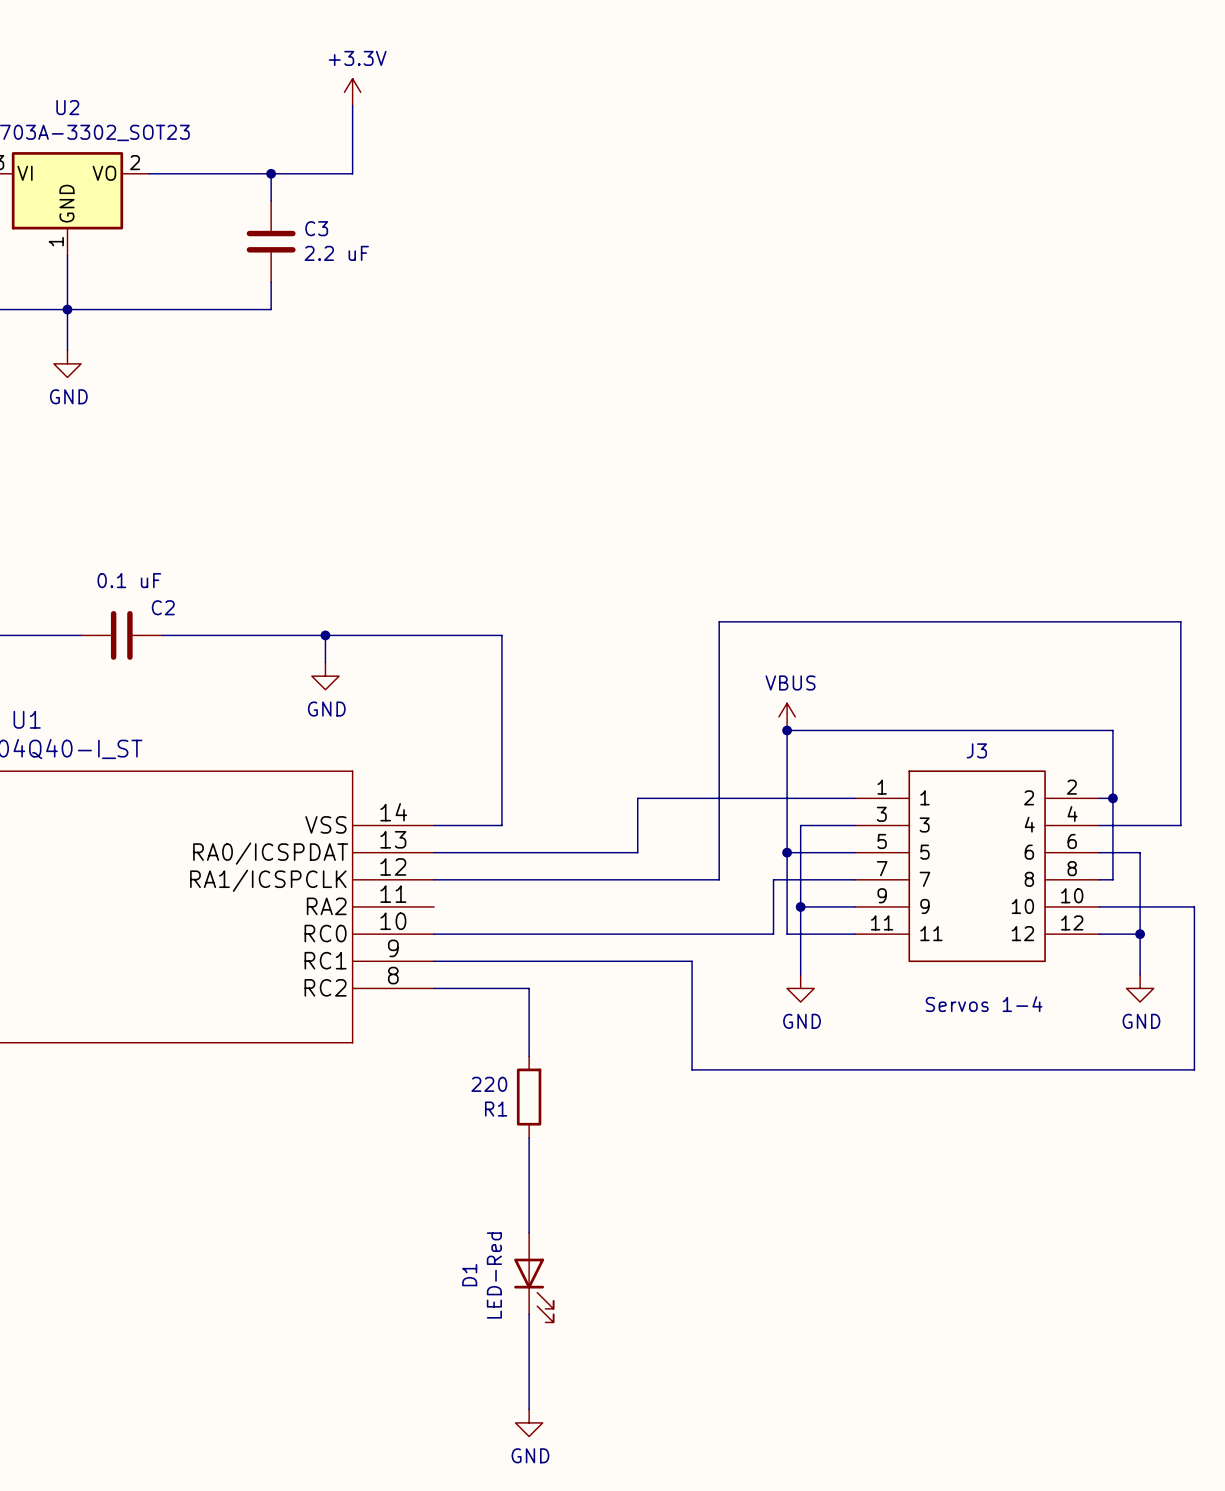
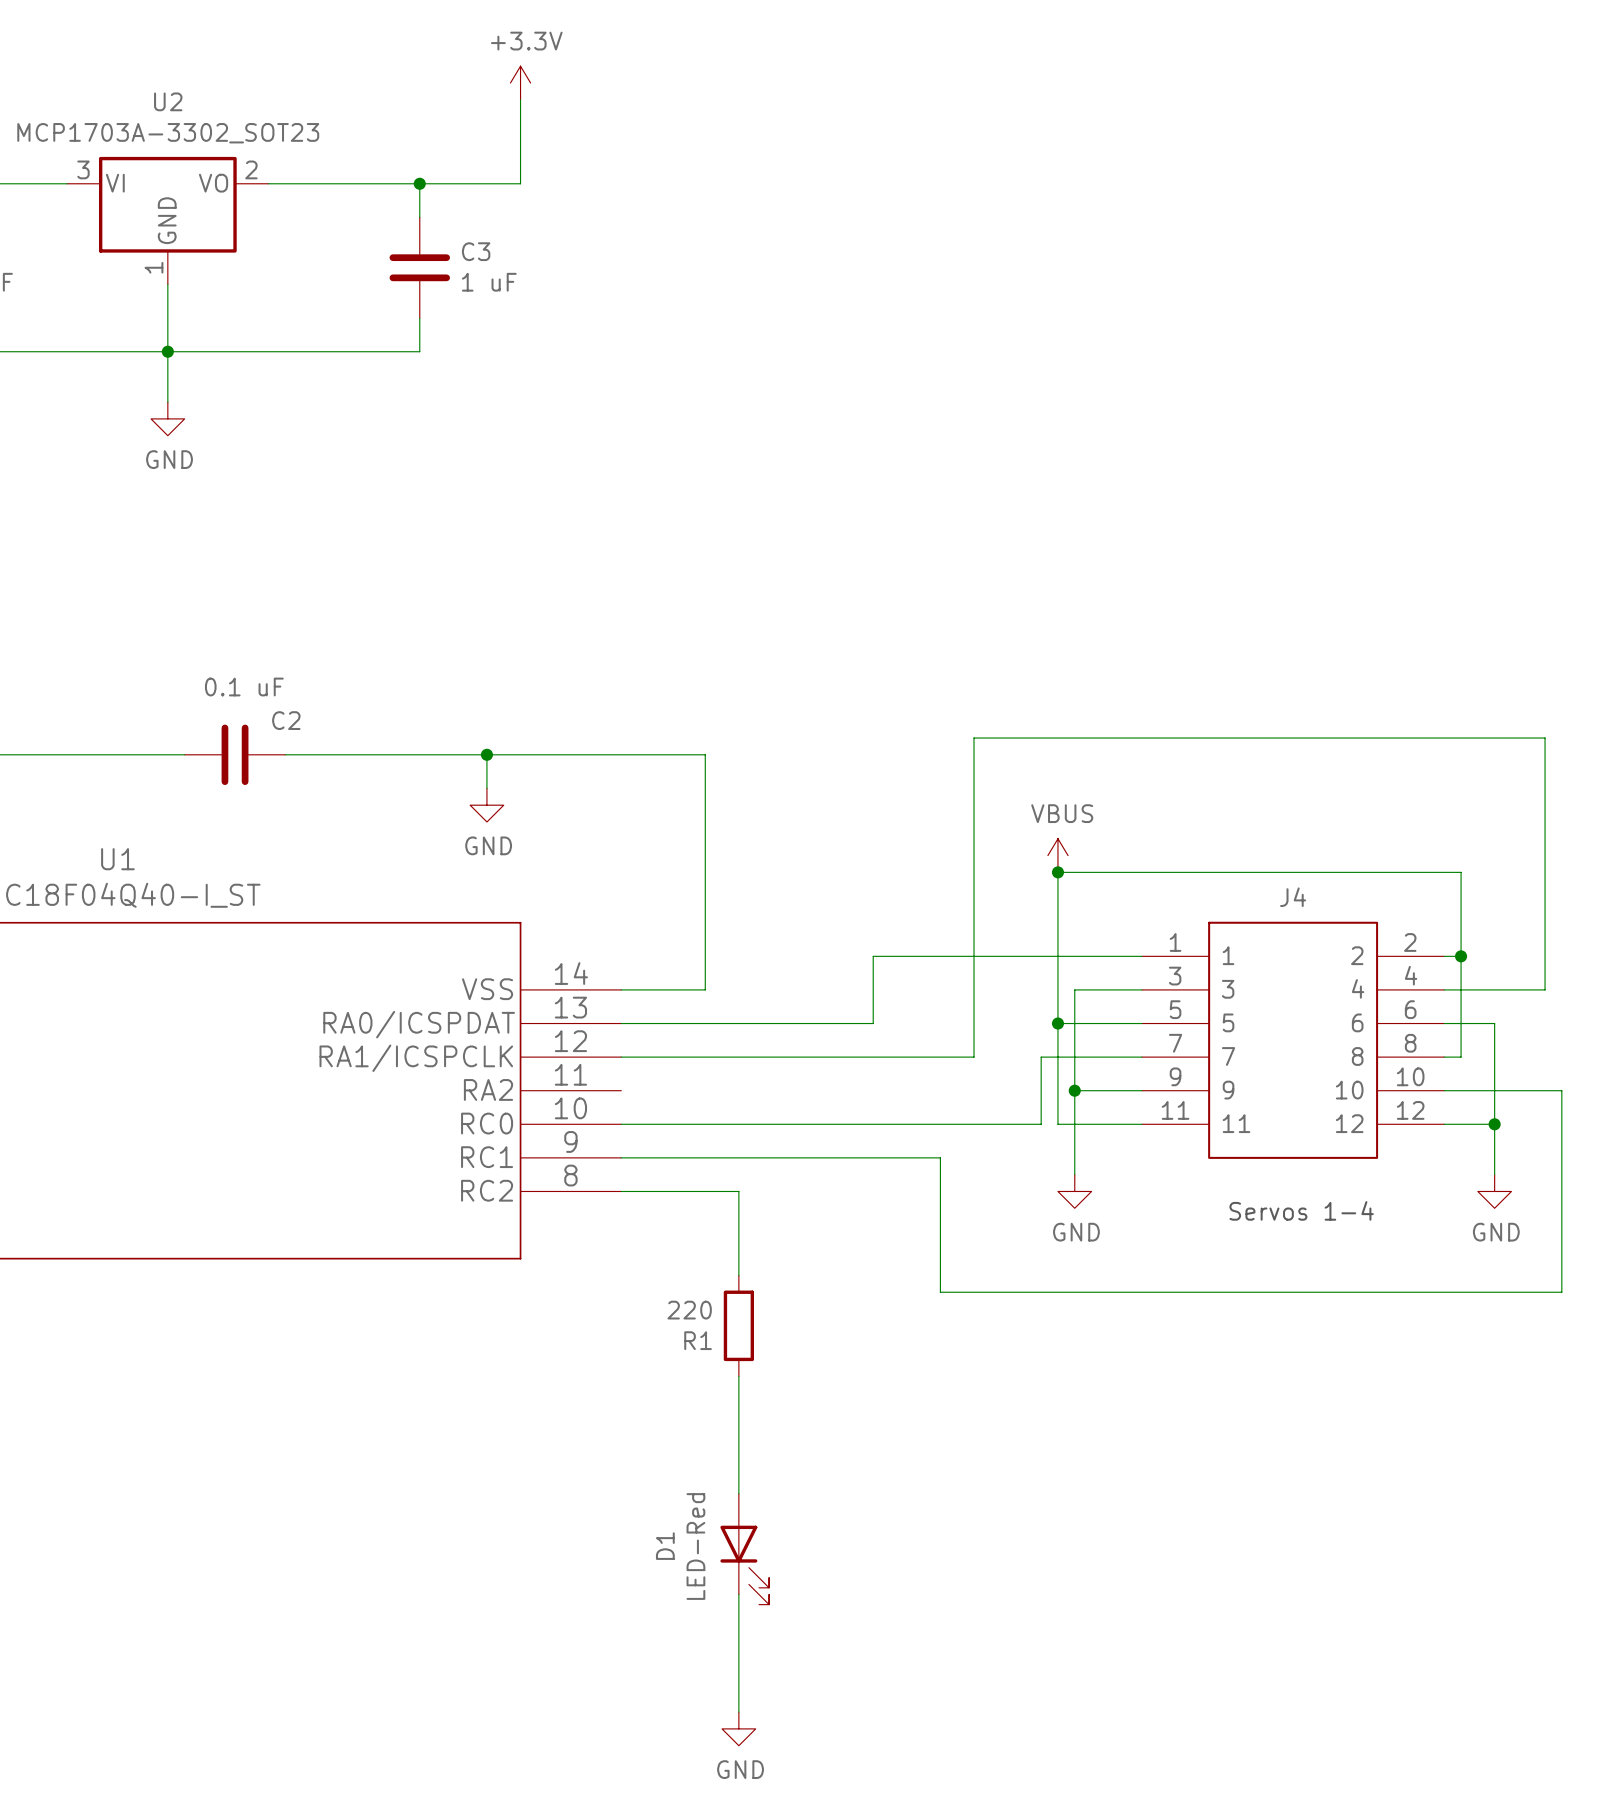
C3 value: 2.2 uF (336, 253) -> 1 uF (489, 282)
J3 name: J3 (976, 750) -> J4 (1293, 897)

